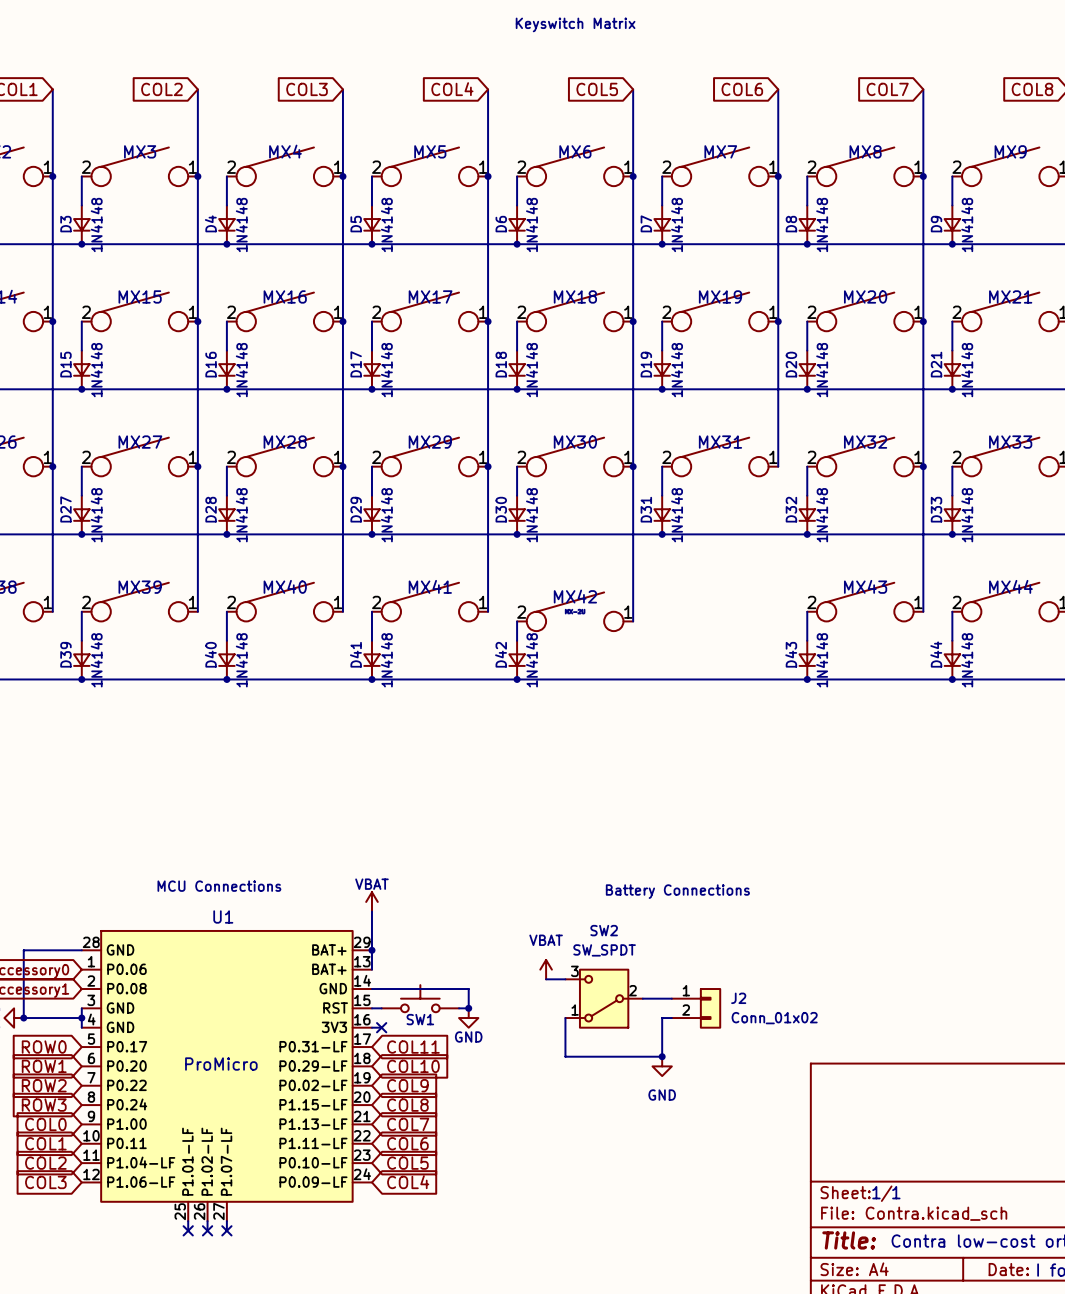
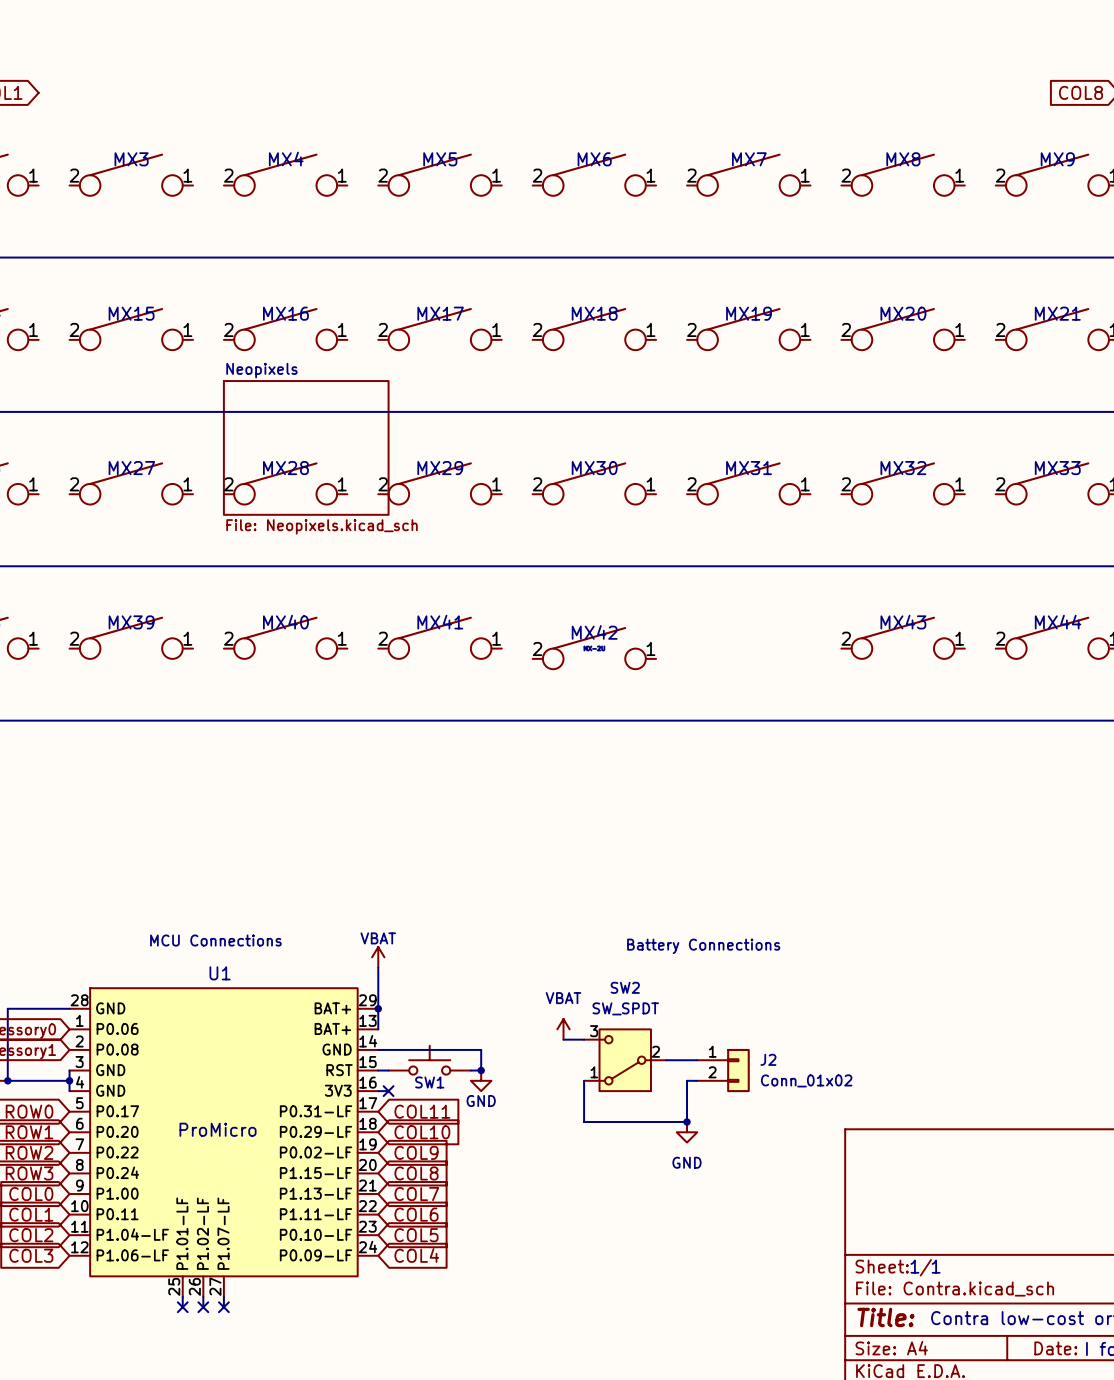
text: Keyswitch Matrix (575, 24) -> none
wire: (52, 89) (52, 611) -> none
global label: COL2 (161, 89) -> none
wire: (197, 89) (197, 611) -> none
global label: COL3 (307, 89) -> none
wire: (342, 89) (342, 611) -> none
global label: COL4 (452, 89) -> none
wire: (488, 89) (488, 611) -> none
global label: COL5 (597, 89) -> none
wire: (633, 89) (633, 621) -> none
global label: COL6 (742, 89) -> none
wire: (778, 89) (778, 466) -> none
global label: COL7 (887, 89) -> none
wire: (923, 89) (923, 611) -> none
junction: (52, 176) -> none
wire: (81, 176) (81, 205) -> none
junction: (197, 176) -> none
wire: (226, 176) (226, 205) -> none
junction: (342, 176) -> none
wire: (371, 176) (371, 205) -> none
junction: (488, 176) -> none
wire: (517, 176) (517, 205) -> none
junction: (633, 176) -> none
wire: (662, 176) (662, 205) -> none
junction: (778, 176) -> none
wire: (807, 176) (807, 205) -> none
junction: (923, 176) -> none
wire: (952, 176) (952, 205) -> none
D3: 1N4148 (81, 224) -> none
D4: 1N4148 (226, 224) -> none
D5: 1N4148 (371, 224) -> none
D6: 1N4148 (517, 224) -> none
D7: 1N4148 (662, 224) -> none
D8: 1N4148 (807, 224) -> none
D9: 1N4148 (952, 224) -> none
junction: (81, 244) -> none
junction: (226, 244) -> none
junction: (371, 244) -> none
junction: (517, 244) -> none
junction: (662, 244) -> none
junction: (807, 244) -> none
junction: (952, 244) -> none
junction: (52, 321) -> none
wire: (81, 321) (81, 350) -> none
junction: (197, 321) -> none
wire: (226, 321) (226, 350) -> none
junction: (342, 321) -> none
wire: (371, 321) (371, 350) -> none
junction: (488, 321) -> none
wire: (517, 321) (517, 350) -> none
junction: (633, 321) -> none
wire: (662, 321) (662, 350) -> none
junction: (778, 321) -> none
wire: (807, 321) (807, 350) -> none
junction: (923, 321) -> none
wire: (952, 321) (952, 350) -> none
D15: 1N4148 (81, 369) -> none
D16: 1N4148 (226, 369) -> none
D17: 1N4148 (371, 369) -> none
D18: 1N4148 (517, 369) -> none
D19: 1N4148 (662, 369) -> none
D20: 1N4148 (807, 369) -> none
D21: 1N4148 (952, 369) -> none
junction: (81, 389) -> none
junction: (226, 389) -> none
junction: (371, 389) -> none
junction: (517, 389) -> none
junction: (662, 389) -> none
junction: (807, 389) -> none
junction: (952, 389) -> none
sheet Neopixels: none -> File: Neopixels.kicad_sch (306, 447)
junction: (52, 466) -> none
wire: (81, 466) (81, 495) -> none
junction: (197, 466) -> none
junction: (342, 466) -> none
wire: (371, 466) (371, 495) -> none
junction: (488, 466) -> none
wire: (517, 466) (517, 495) -> none
junction: (633, 466) -> none
wire: (662, 466) (662, 495) -> none
wire: (807, 466) (807, 495) -> none
junction: (923, 466) -> none
wire: (952, 466) (952, 495) -> none
D27: 1N4148 (81, 515) -> none
D28: 1N4148 (226, 515) -> none
D29: 1N4148 (371, 515) -> none
D30: 1N4148 (517, 515) -> none
D31: 1N4148 (662, 515) -> none
D32: 1N4148 (807, 515) -> none
D33: 1N4148 (952, 515) -> none
junction: (81, 534) -> none
junction: (226, 534) -> none
junction: (371, 534) -> none
junction: (517, 534) -> none
junction: (662, 534) -> none
junction: (807, 534) -> none
junction: (952, 534) -> none
wire: (81, 611) (81, 640) -> none
wire: (226, 611) (226, 640) -> none
wire: (371, 611) (371, 640) -> none
wire: (807, 611) (807, 640) -> none
wire: (952, 611) (952, 640) -> none
wire: (517, 621) (517, 640) -> none
D39: 1N4148 (81, 660) -> none
D40: 1N4148 (226, 660) -> none
D41: 1N4148 (371, 660) -> none
D42: 1N4148 (517, 660) -> none
D43: 1N4148 (807, 660) -> none
D44: 1N4148 (952, 660) -> none
junction: (81, 679) -> none
junction: (226, 679) -> none
junction: (371, 679) -> none
junction: (517, 679) -> none
junction: (807, 679) -> none
junction: (952, 679) -> none

